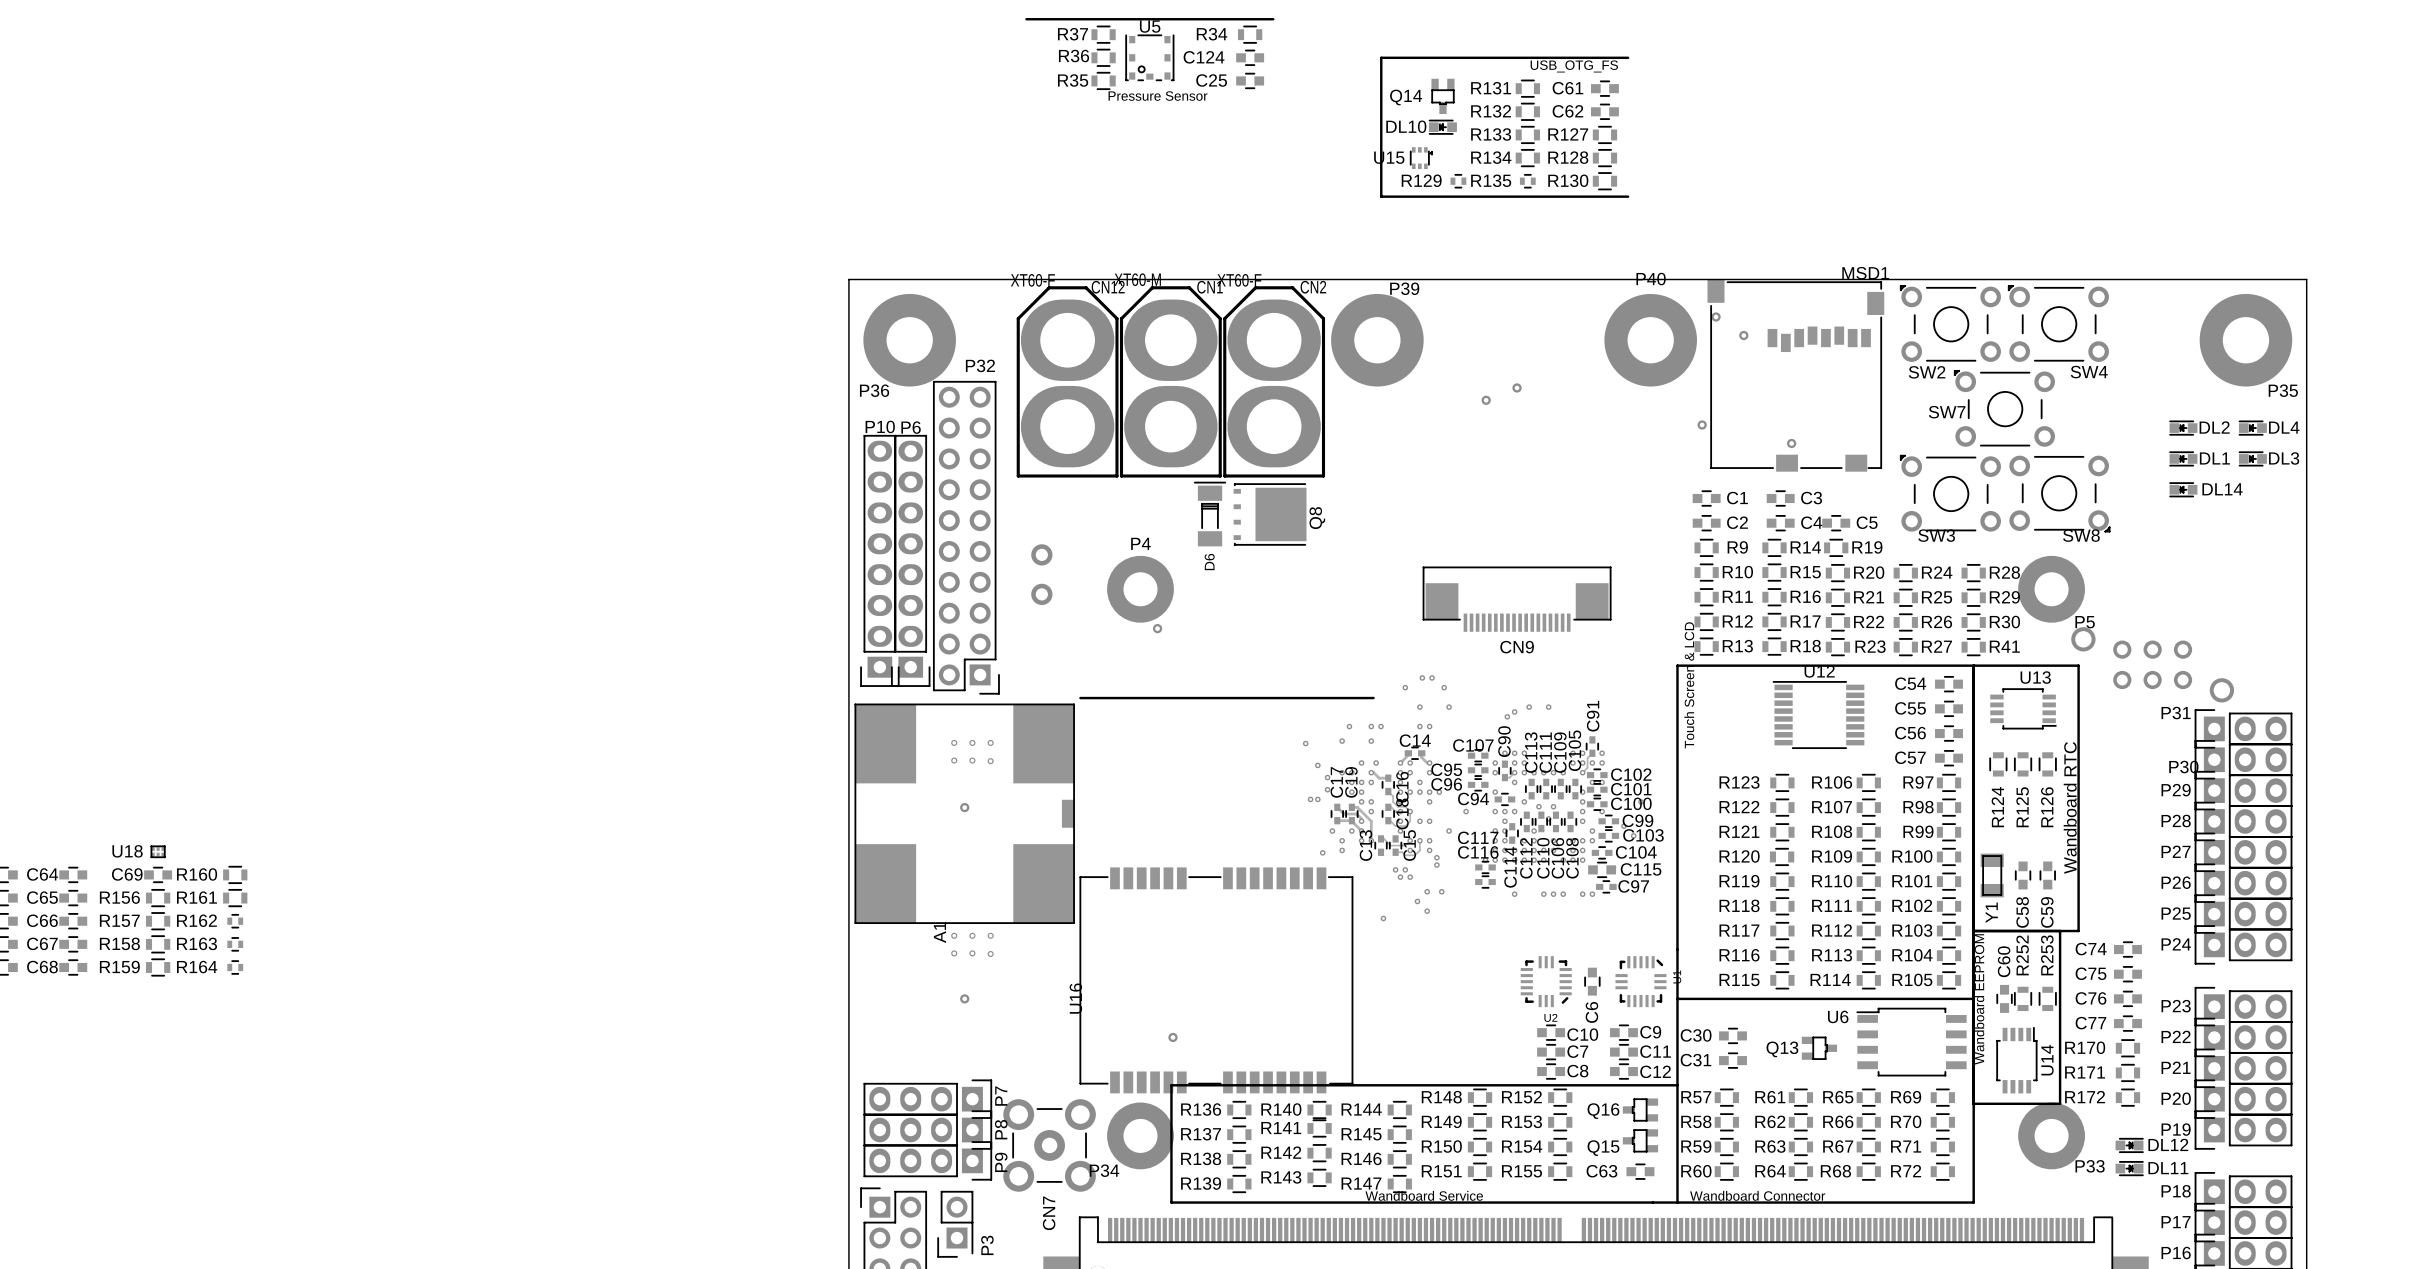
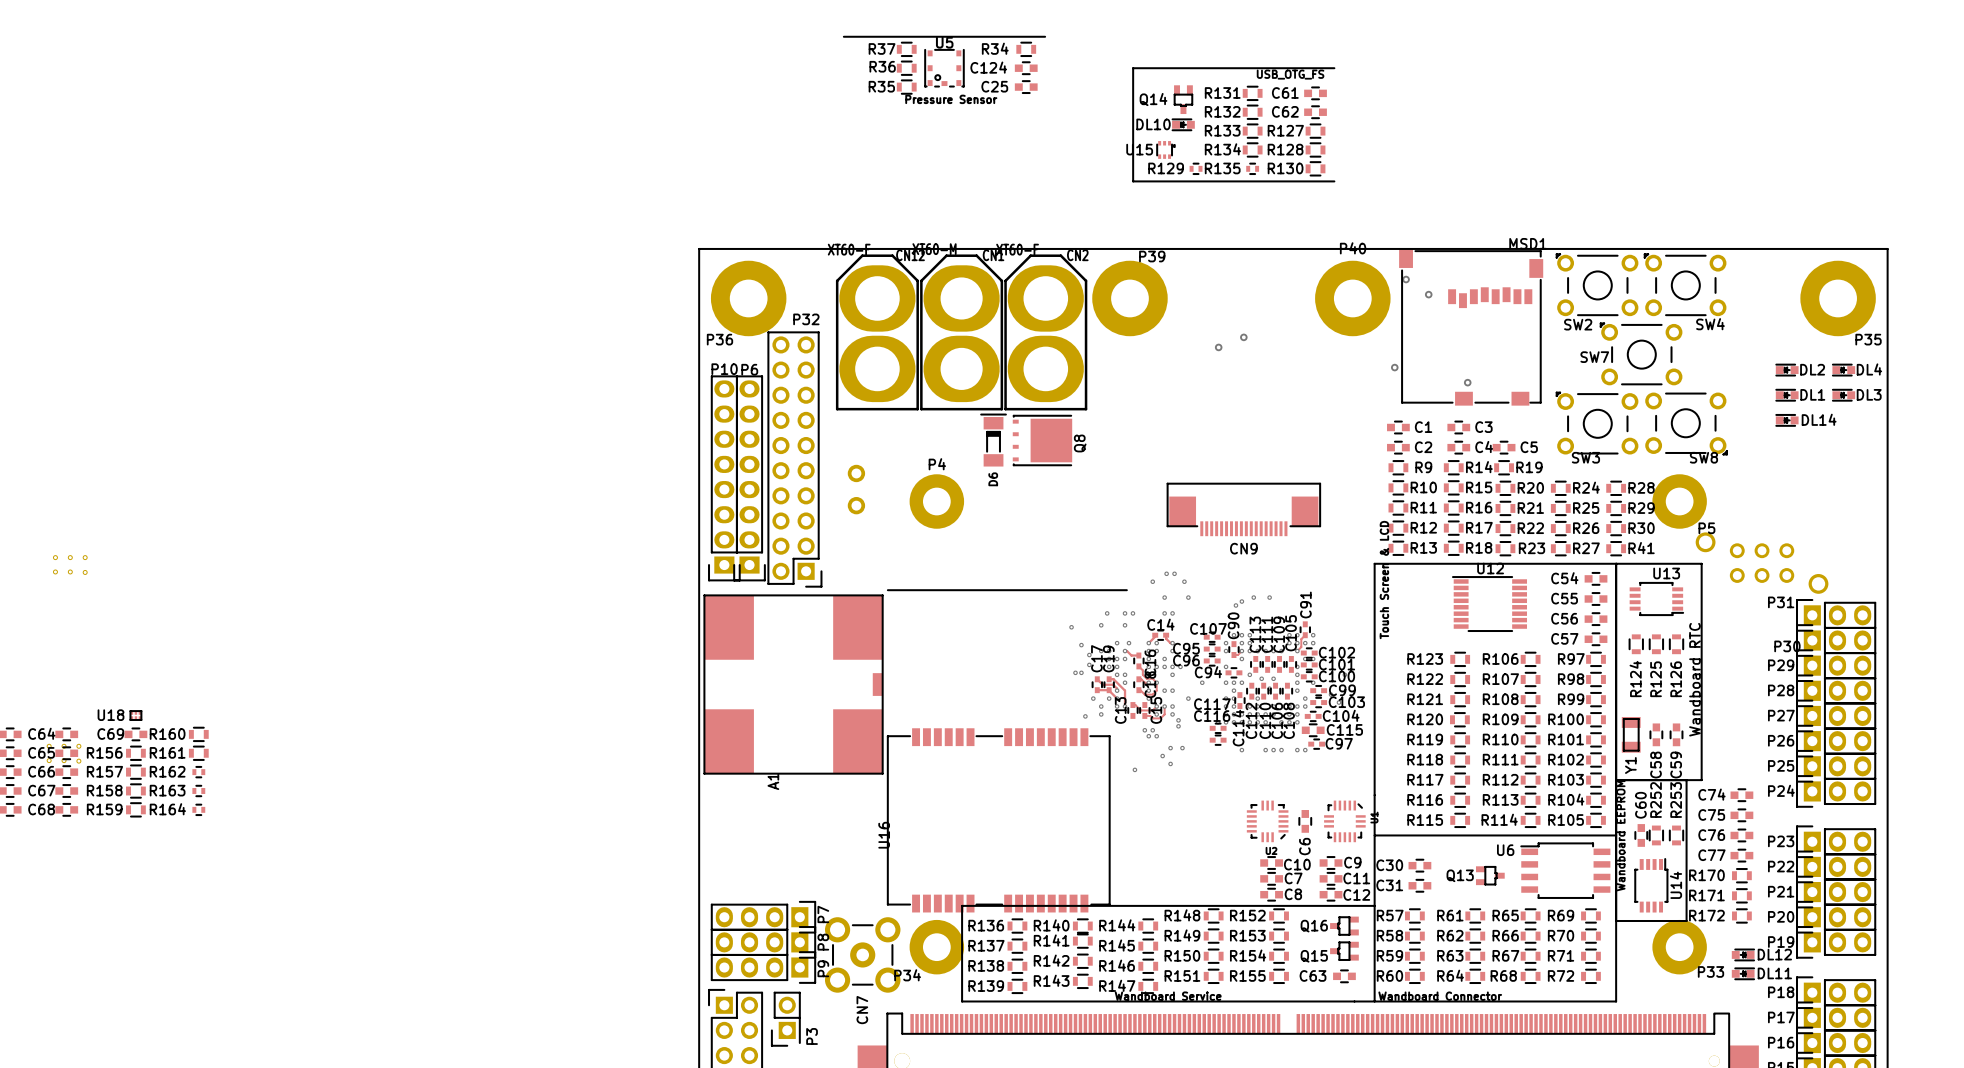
via: (1157, 628) -> none
part: none -> (70, 565)
part: (972, 752) -> none
via: (964, 807) -> none
part: none -> (64, 753)
part: (972, 944) -> none
via: (964, 998) -> none
via: (1172, 1037) -> none

